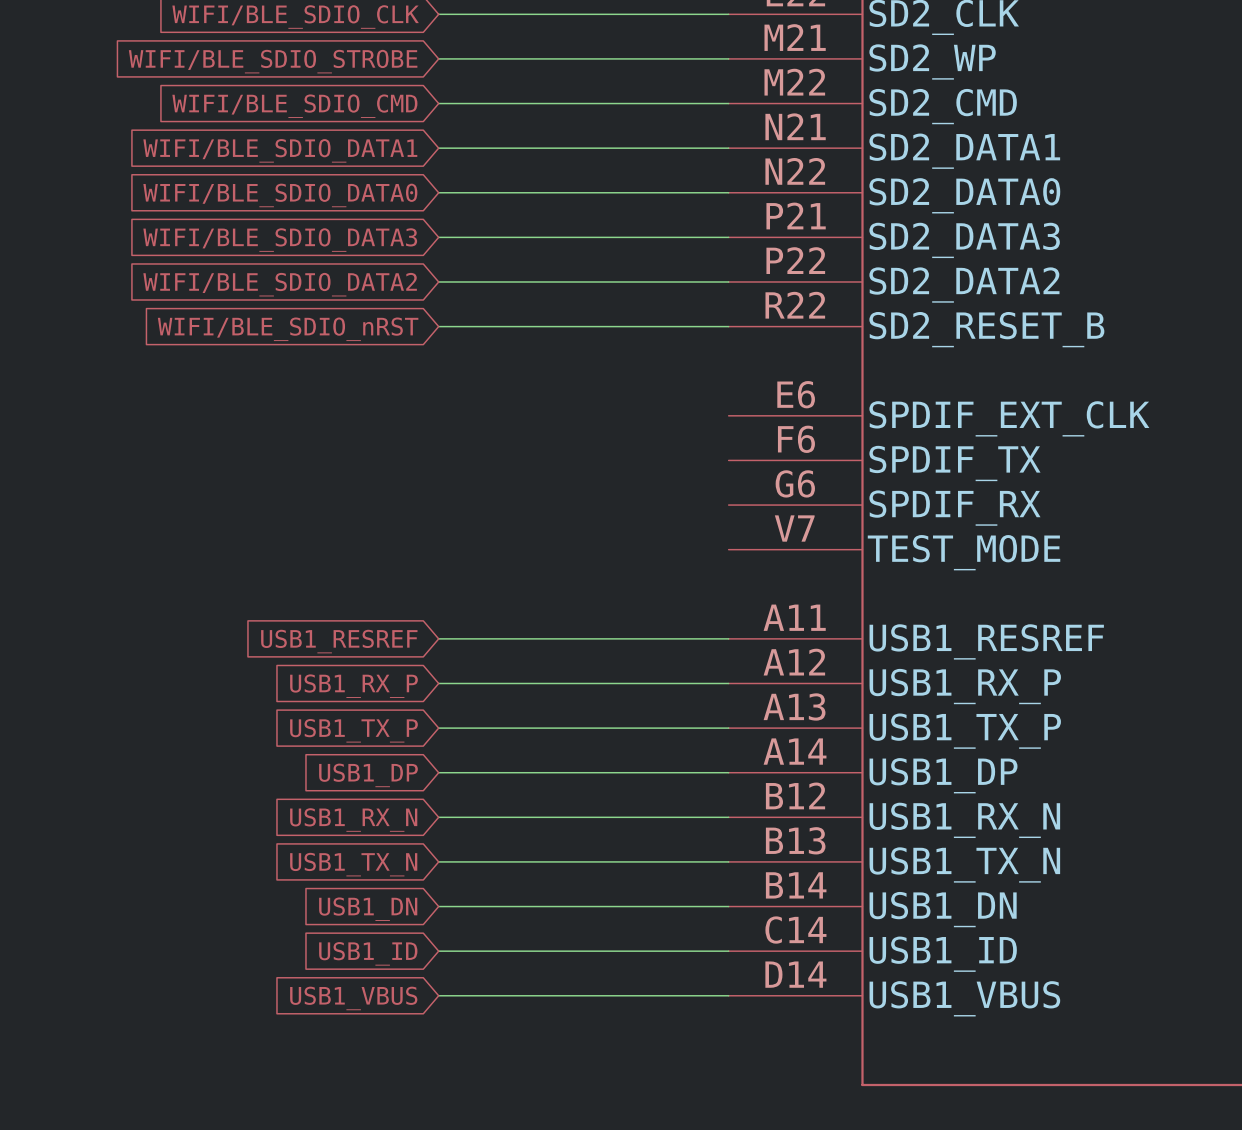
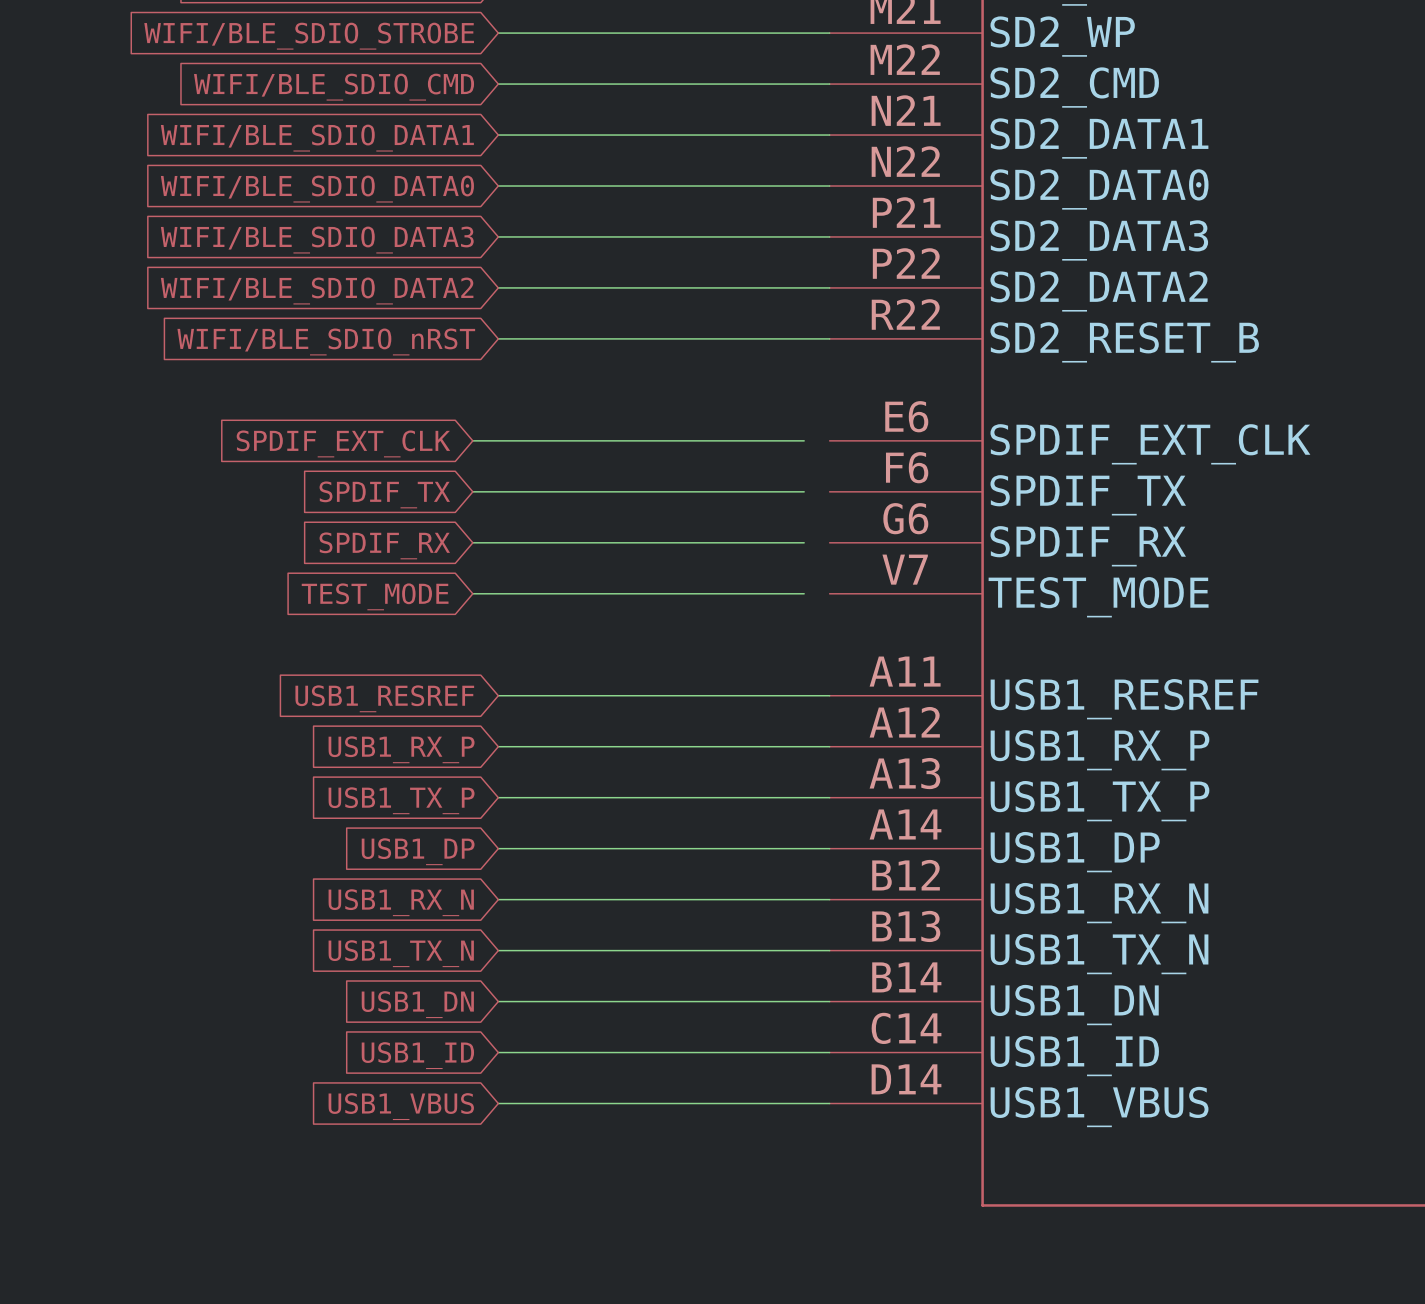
wire: none -> (472, 440) (804, 440)
global label: none -> SPDIF_EXT_CLK (343, 443)
wire: none -> (472, 491) (804, 491)
global label: none -> SPDIF_TX (384, 494)
wire: none -> (472, 542) (804, 542)
global label: none -> SPDIF_RX (384, 545)
wire: none -> (472, 593) (804, 593)
global label: none -> TEST_MODE (375, 596)

